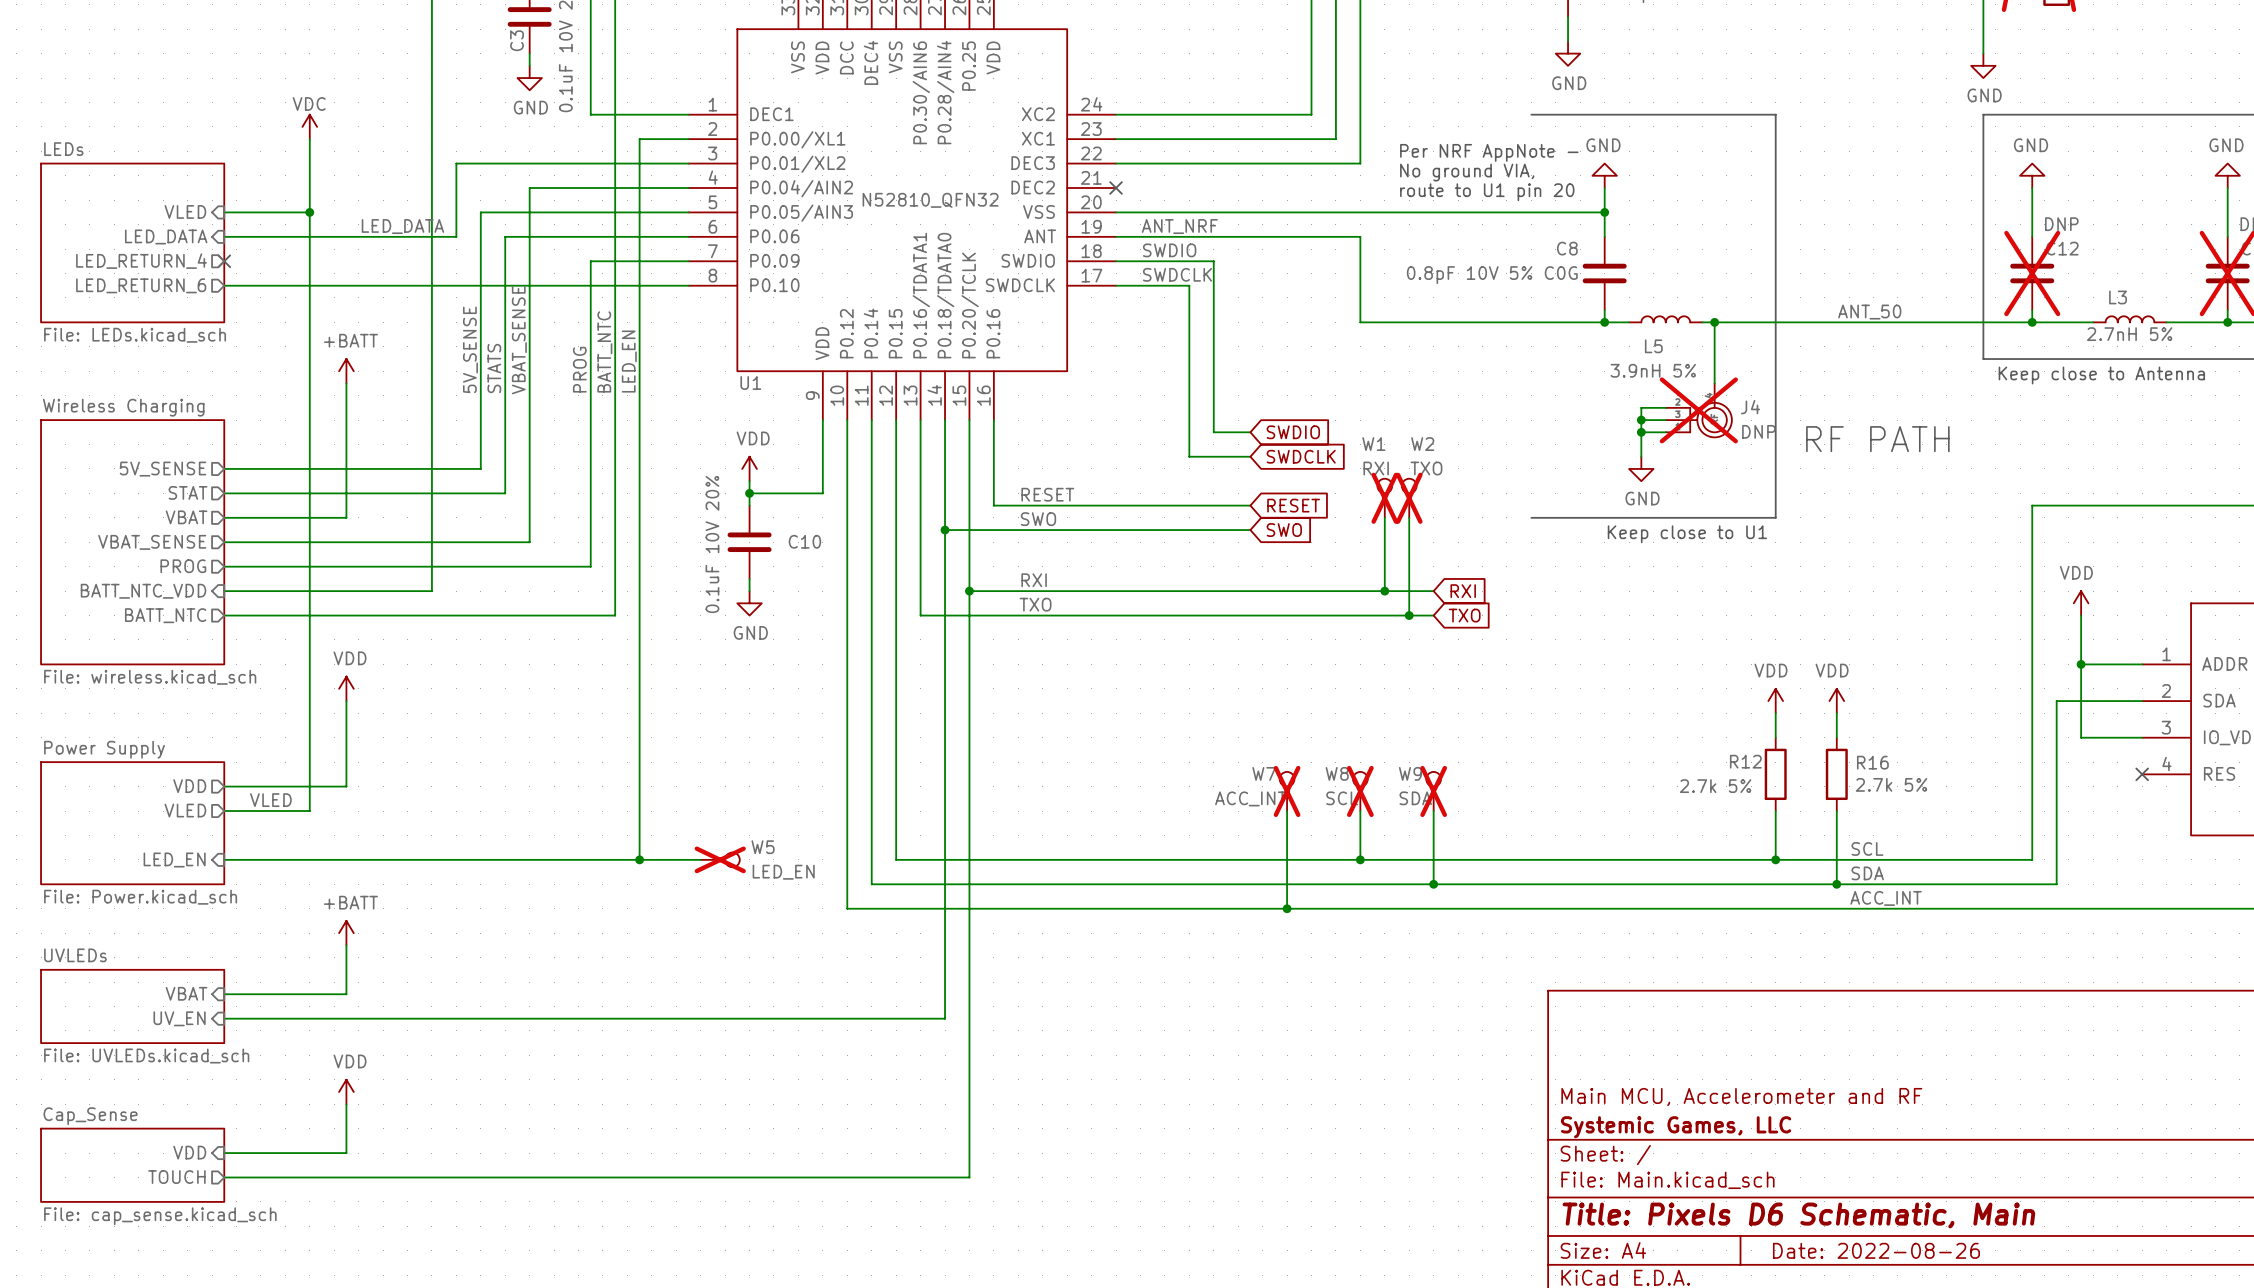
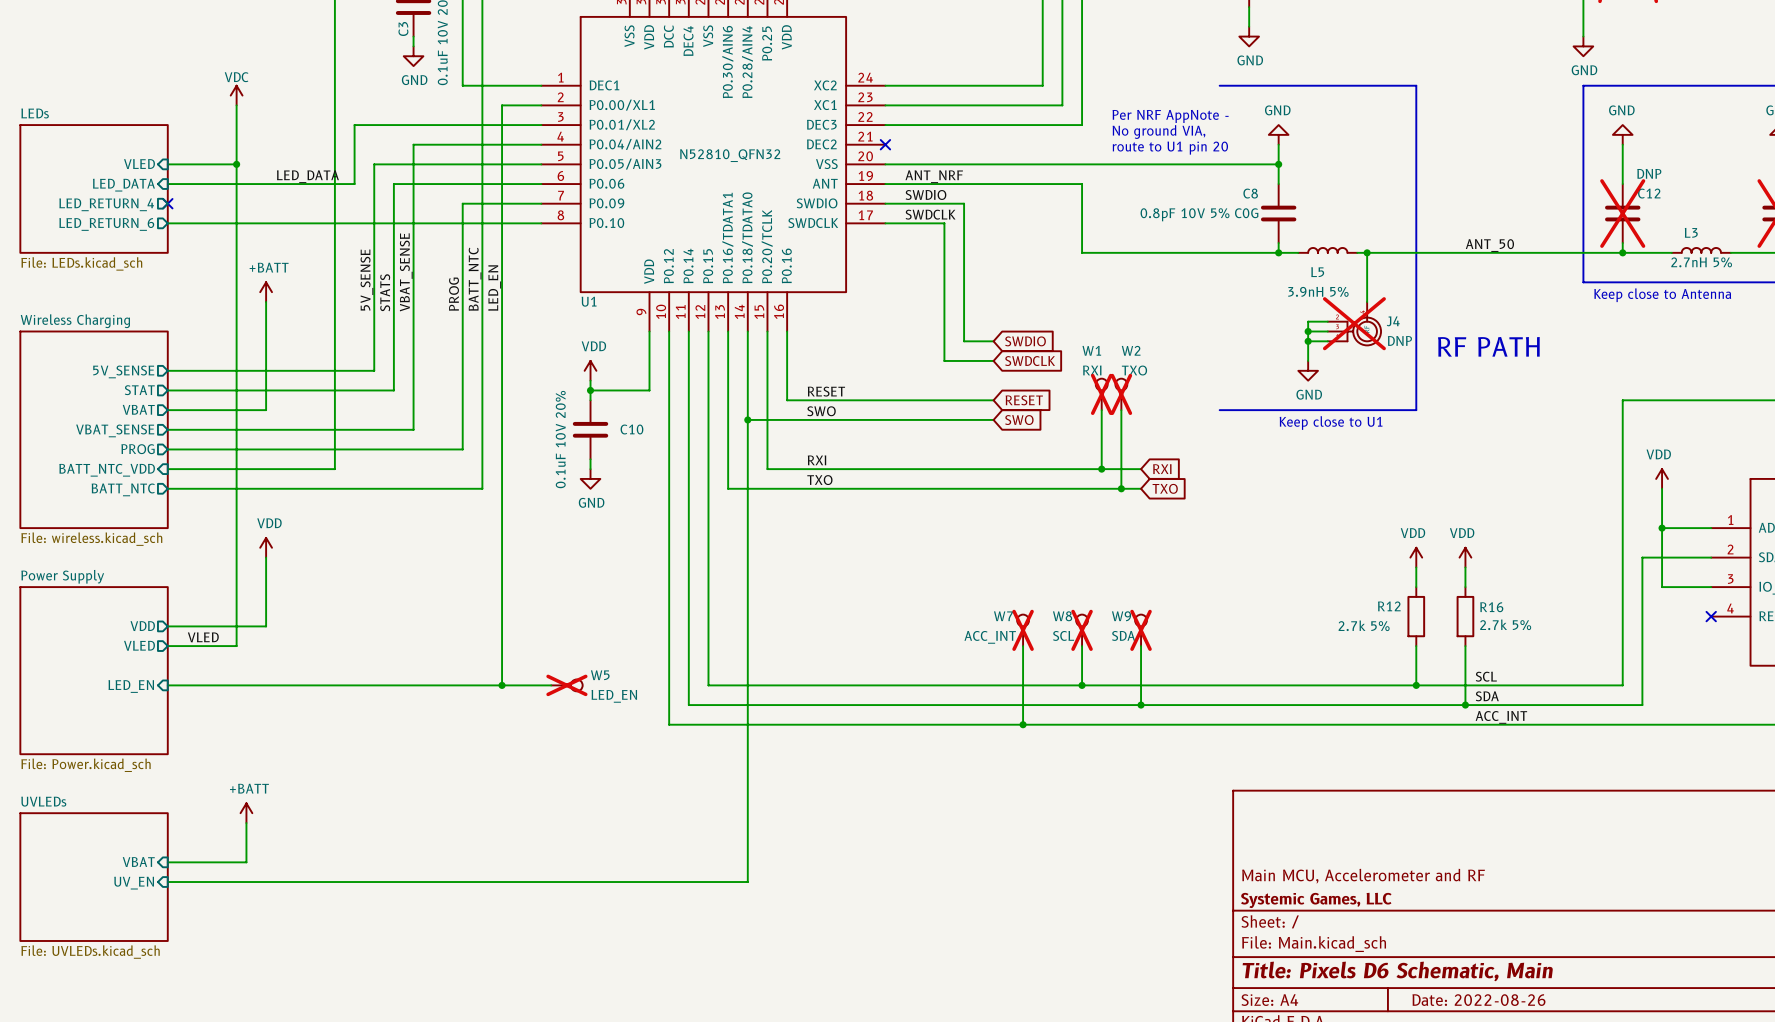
wire: (969, 591) (969, 1177) (224, 1177) -> none
junction: (969, 591) -> none
sheet Power Supply: File: Power.kicad_sch (132, 823) -> none
sheet Power Supply: none -> File: Power.kicad_sch (94, 670)
power symbol position: +BATT (346, 933) -> +BATT (246, 813)
wire: (346, 945) (346, 994) (224, 994) -> none
sheet pin position: VBAT (186, 993) -> VBAT (138, 862)
sheet UVLEDs: File: UVLEDs.kicad_sch (132, 1006) -> none
sheet pin position: UV_EN (179, 1018) -> UV_EN (134, 883)
wire: (224, 1018) (945, 1018) -> (167, 882) (747, 882) (747, 813)
wire: none -> (246, 823) (246, 862) (167, 862)
power symbol: VDD (346, 1091) -> none
sheet UVLEDs: none -> File: UVLEDs.kicad_sch (94, 877)
wire: (346, 1104) (346, 1153) (224, 1153) -> none
sheet pin: VDD (189, 1152) -> none
sheet Cap_Sense: File: cap_sense.kicad_sch (132, 1165) -> none
sheet pin: TOUCH (176, 1177) -> none

